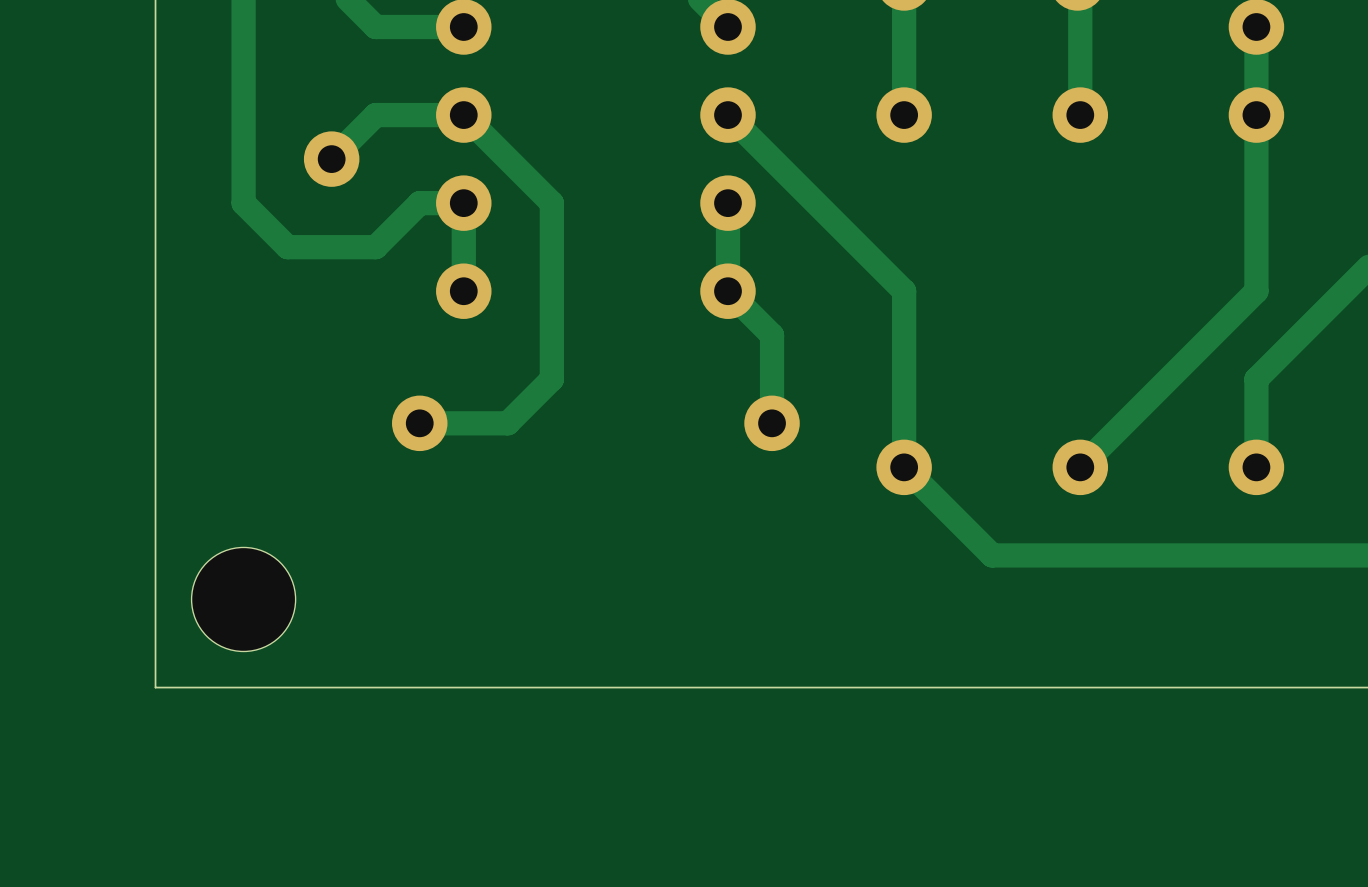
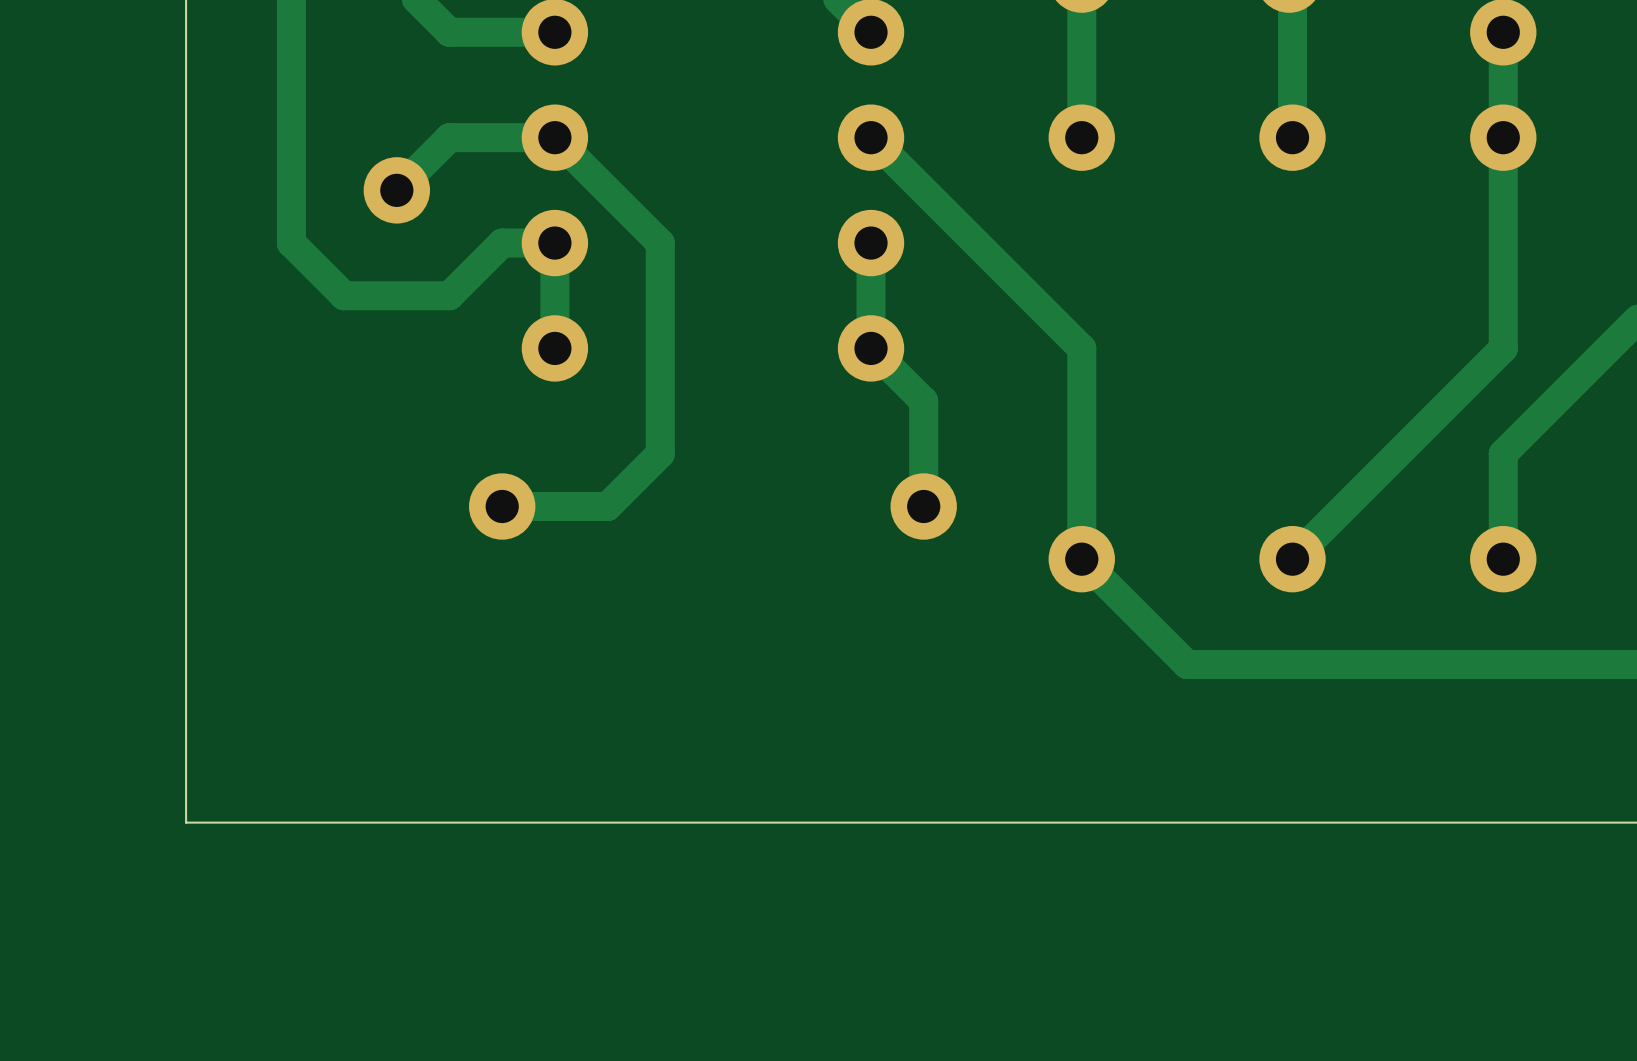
part: (243, 599) -> none

